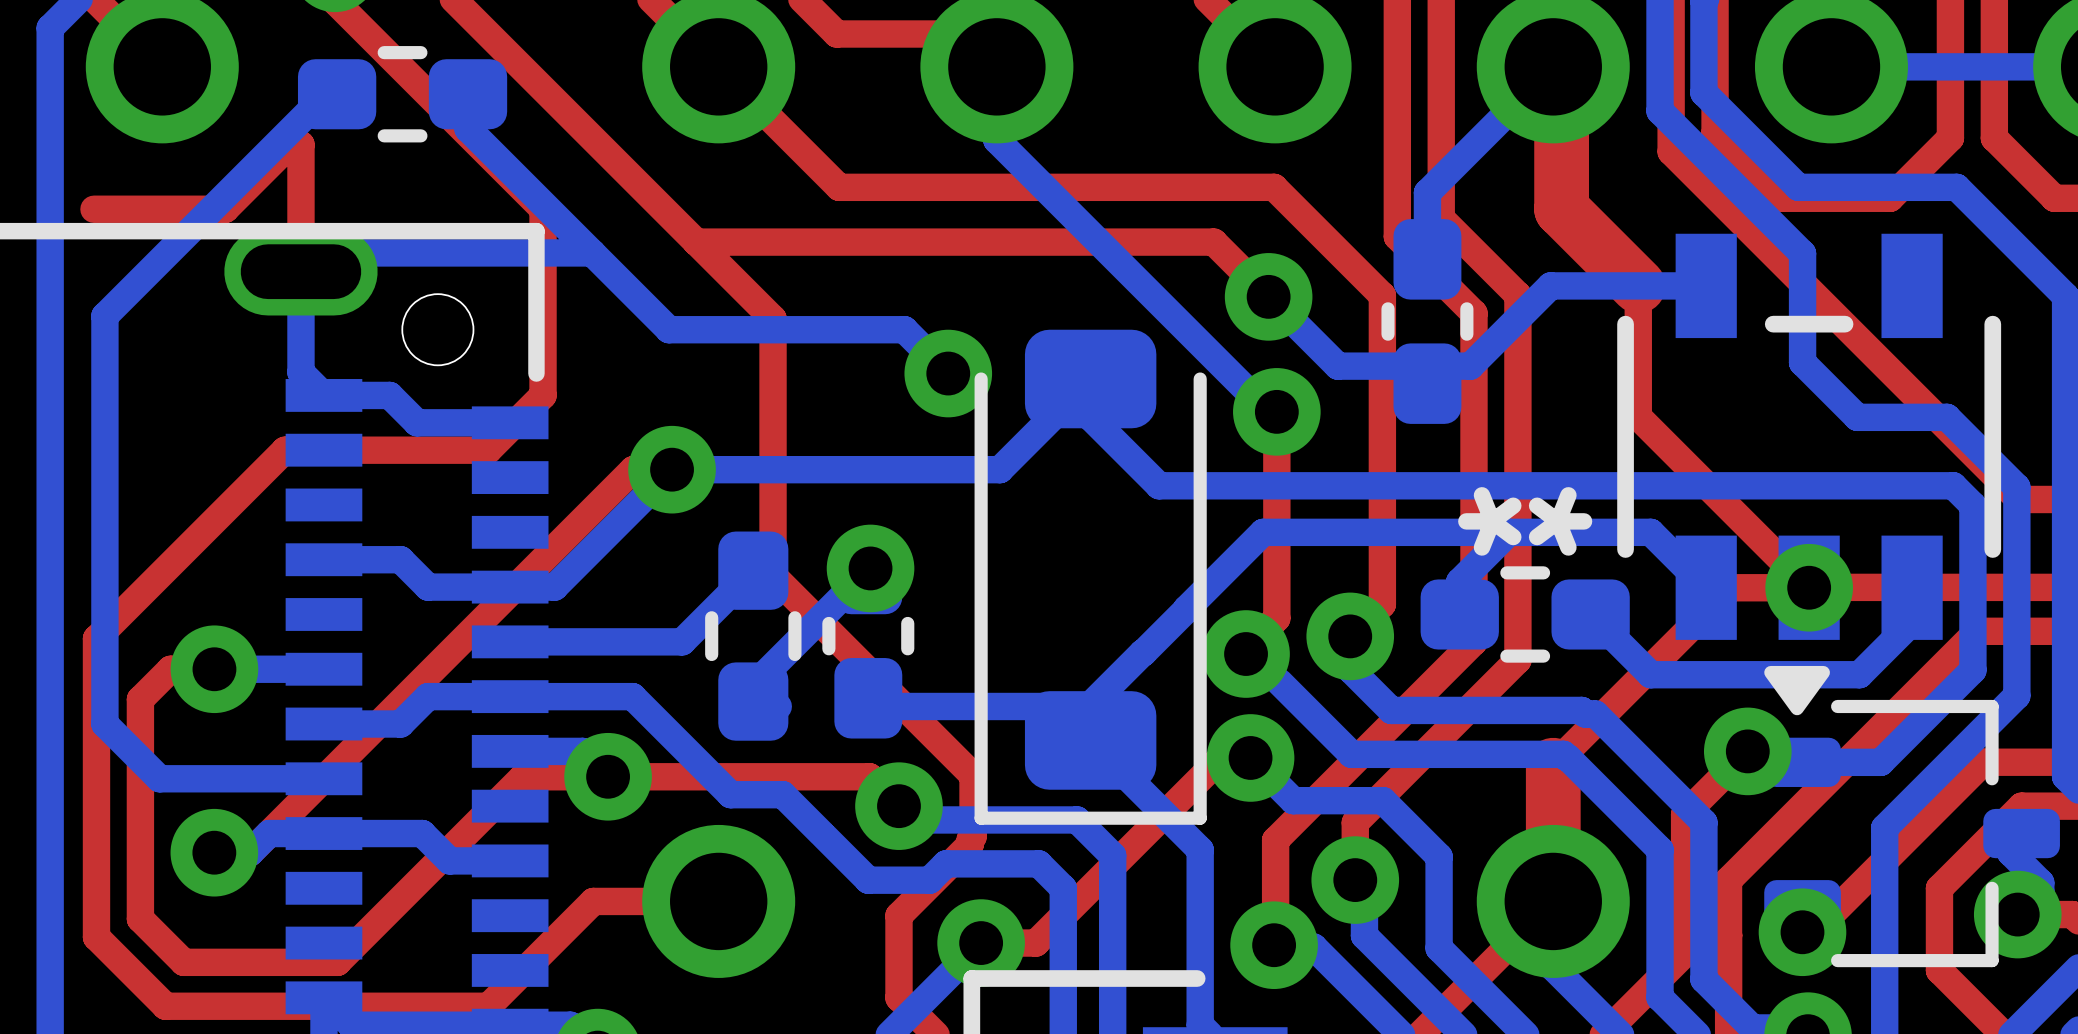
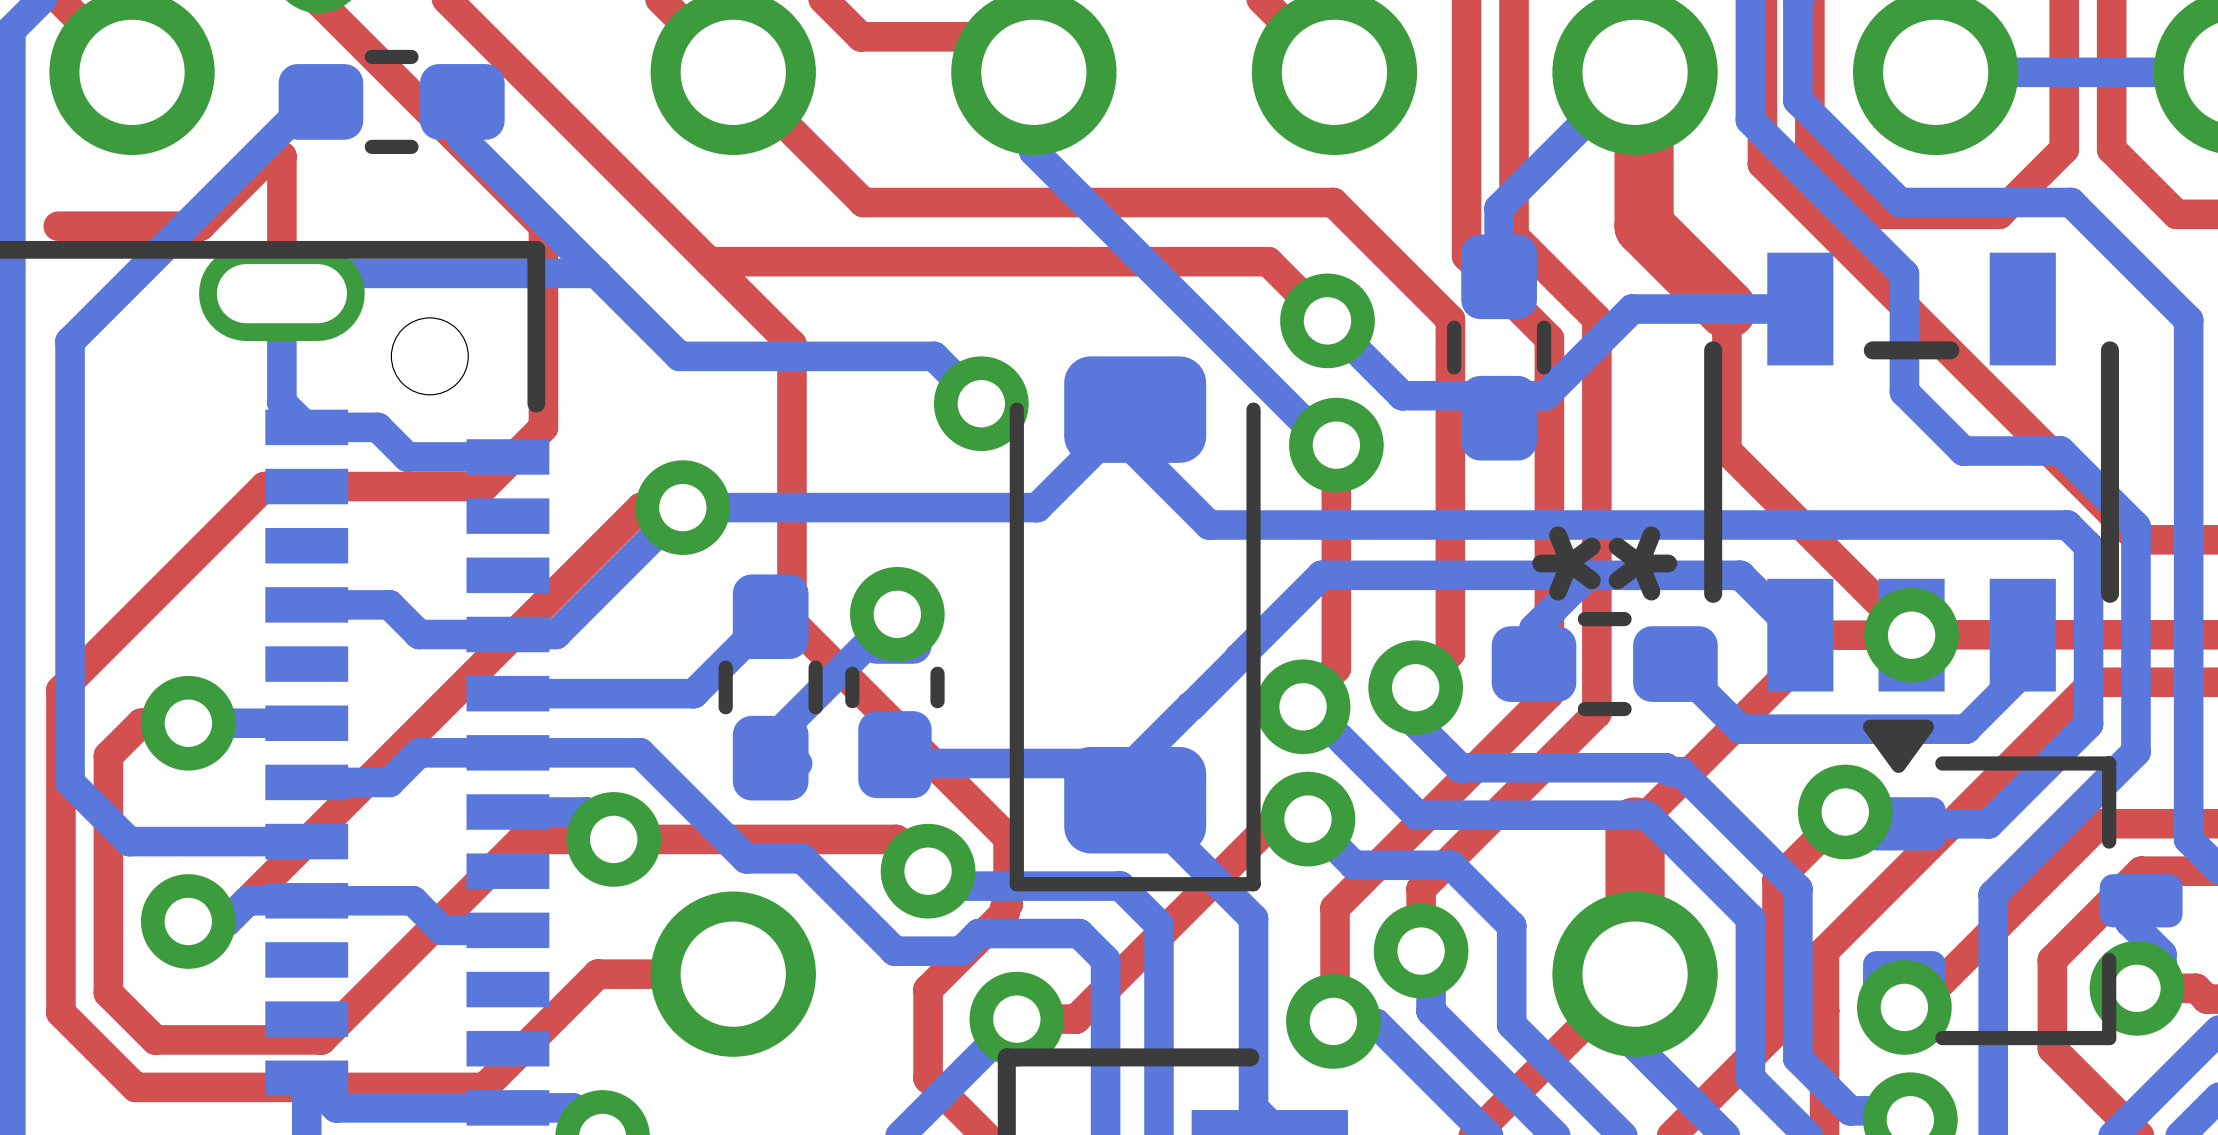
part footprint: [1381, 219, 1474, 424] -> [1447, 234, 1552, 461]

